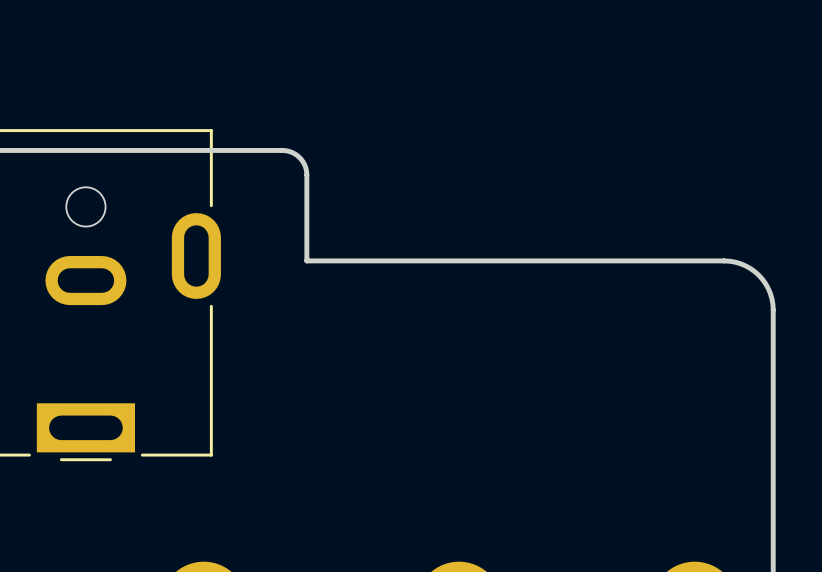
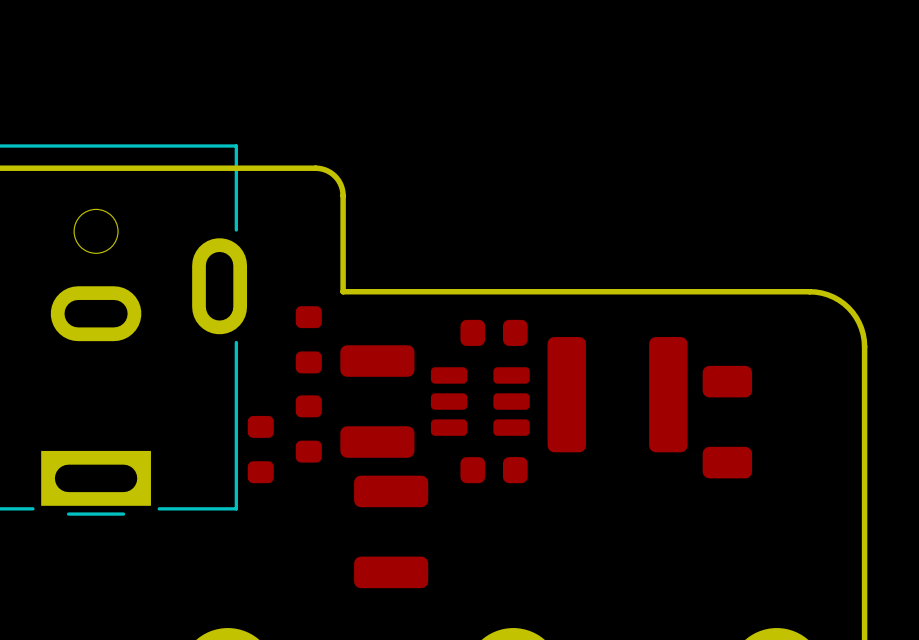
part: none -> (494, 332)
part: none -> (308, 339)
part: none -> (617, 394)
part: none -> (377, 401)
part: none -> (480, 401)
part: none -> (727, 422)
part: none -> (308, 428)
part: none -> (260, 449)
part: none -> (494, 470)
part: none -> (391, 531)

